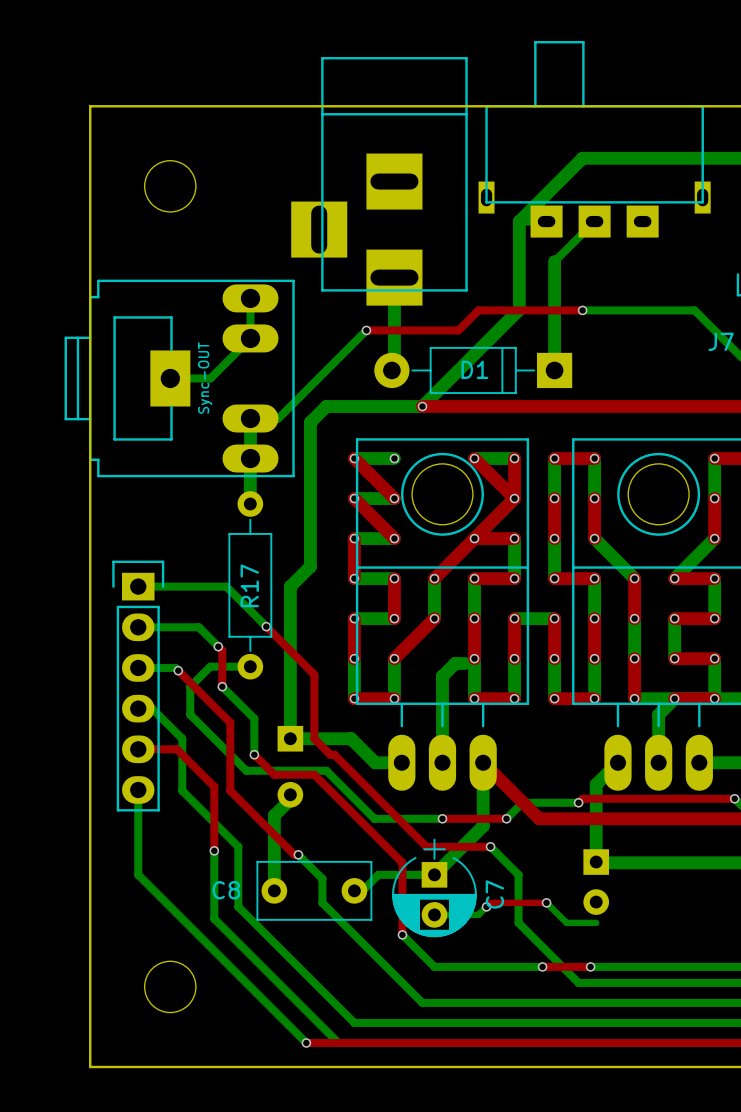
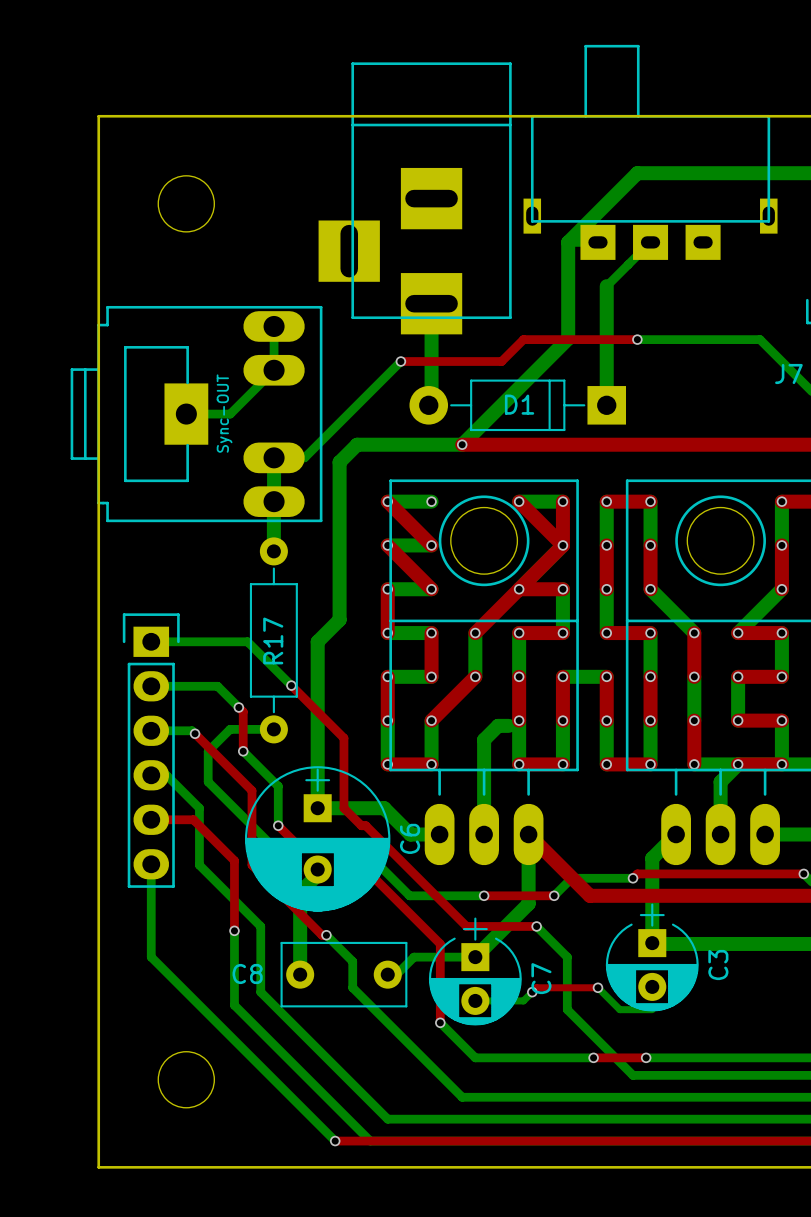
C6 side: bottom (290, 766) -> top (317, 838)
C3 side: bottom (596, 882) -> top (652, 957)

